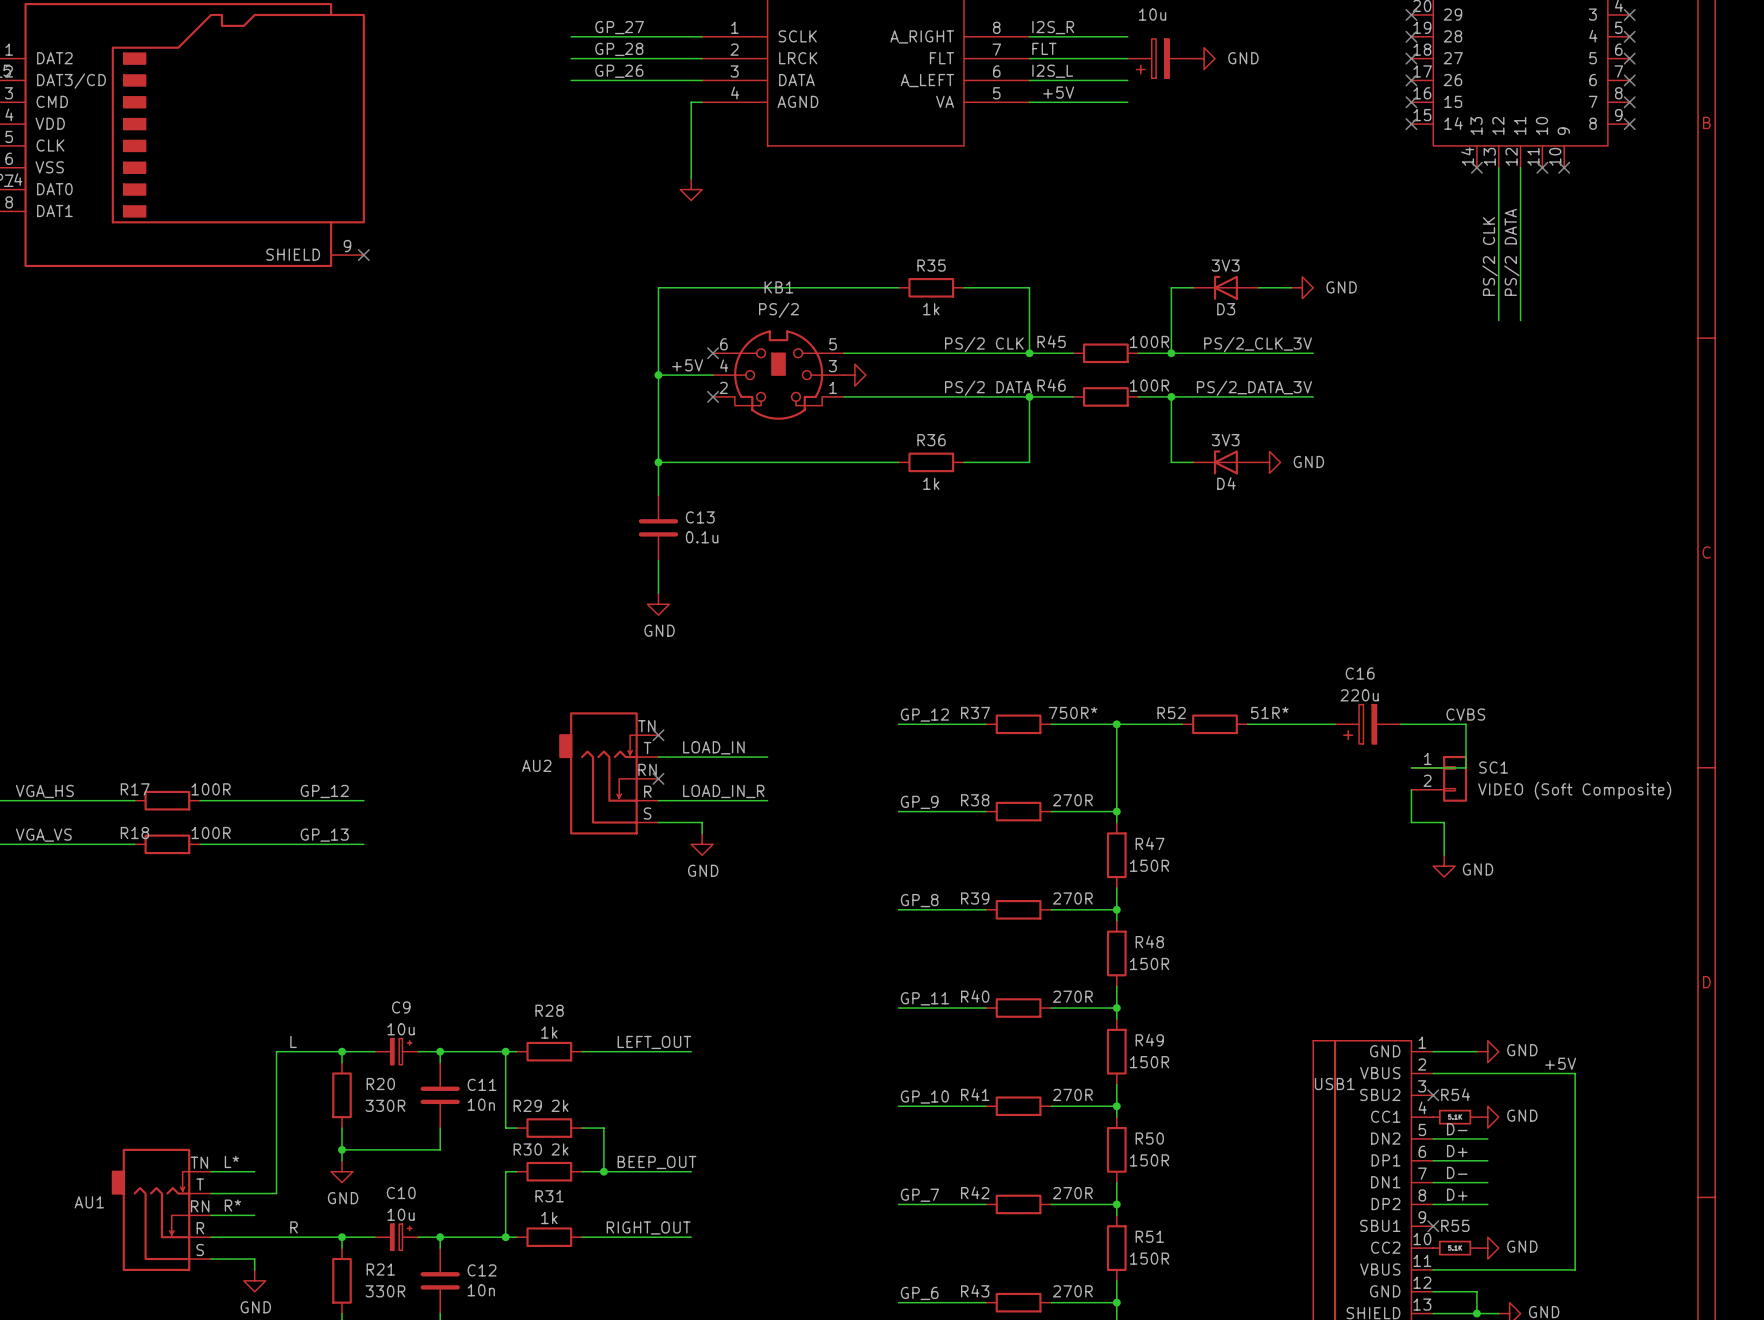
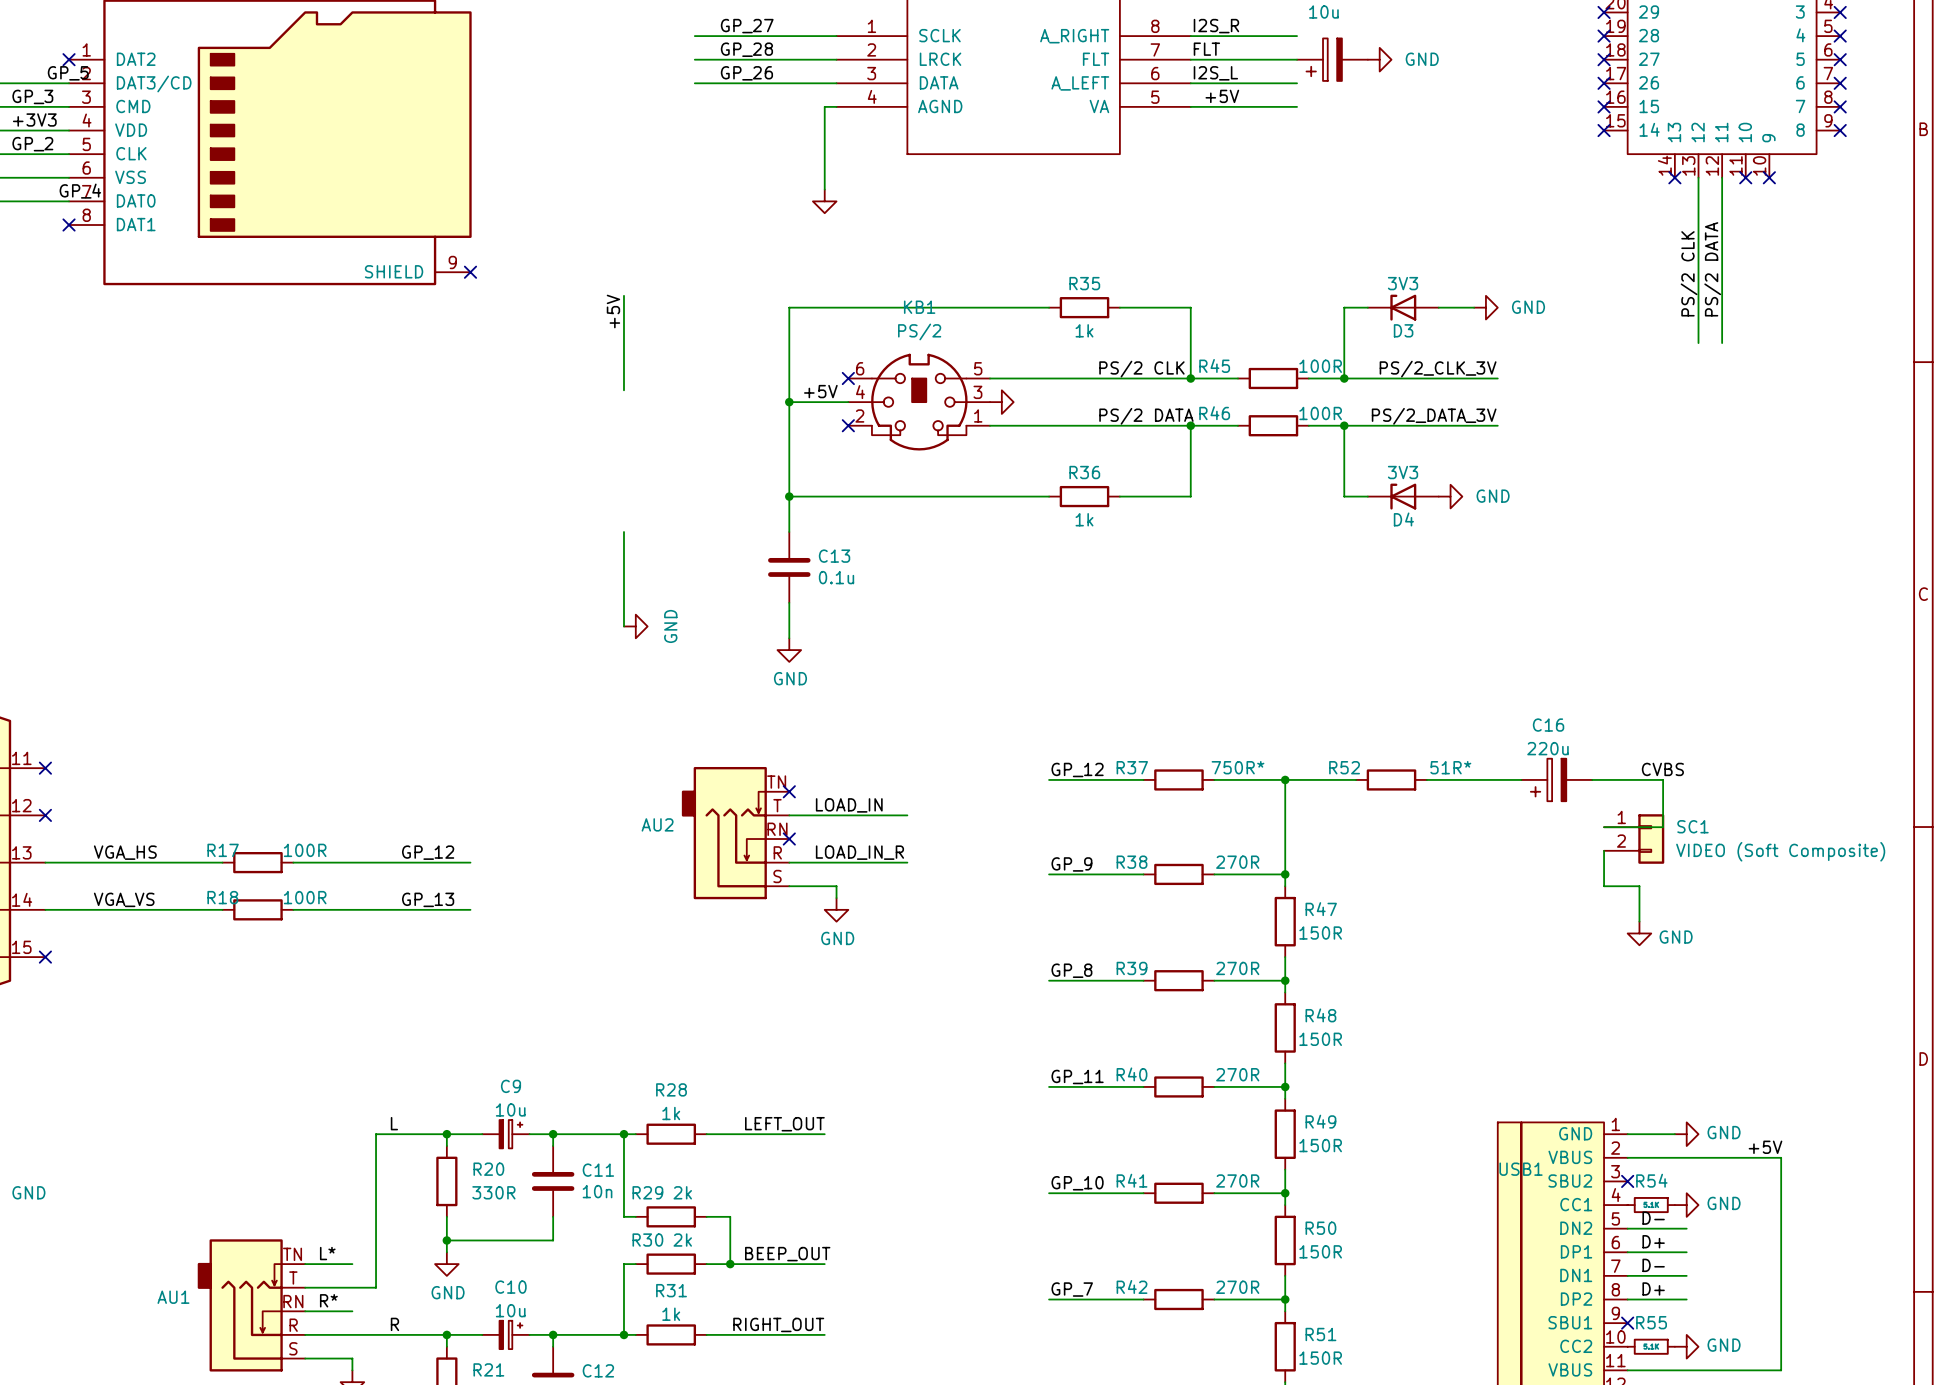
wire: none -> (623, 295) (623, 390)
label: none -> +5V (613, 311)
wire: none -> (623, 532) (623, 626)
power symbol: none -> GND (635, 626)

